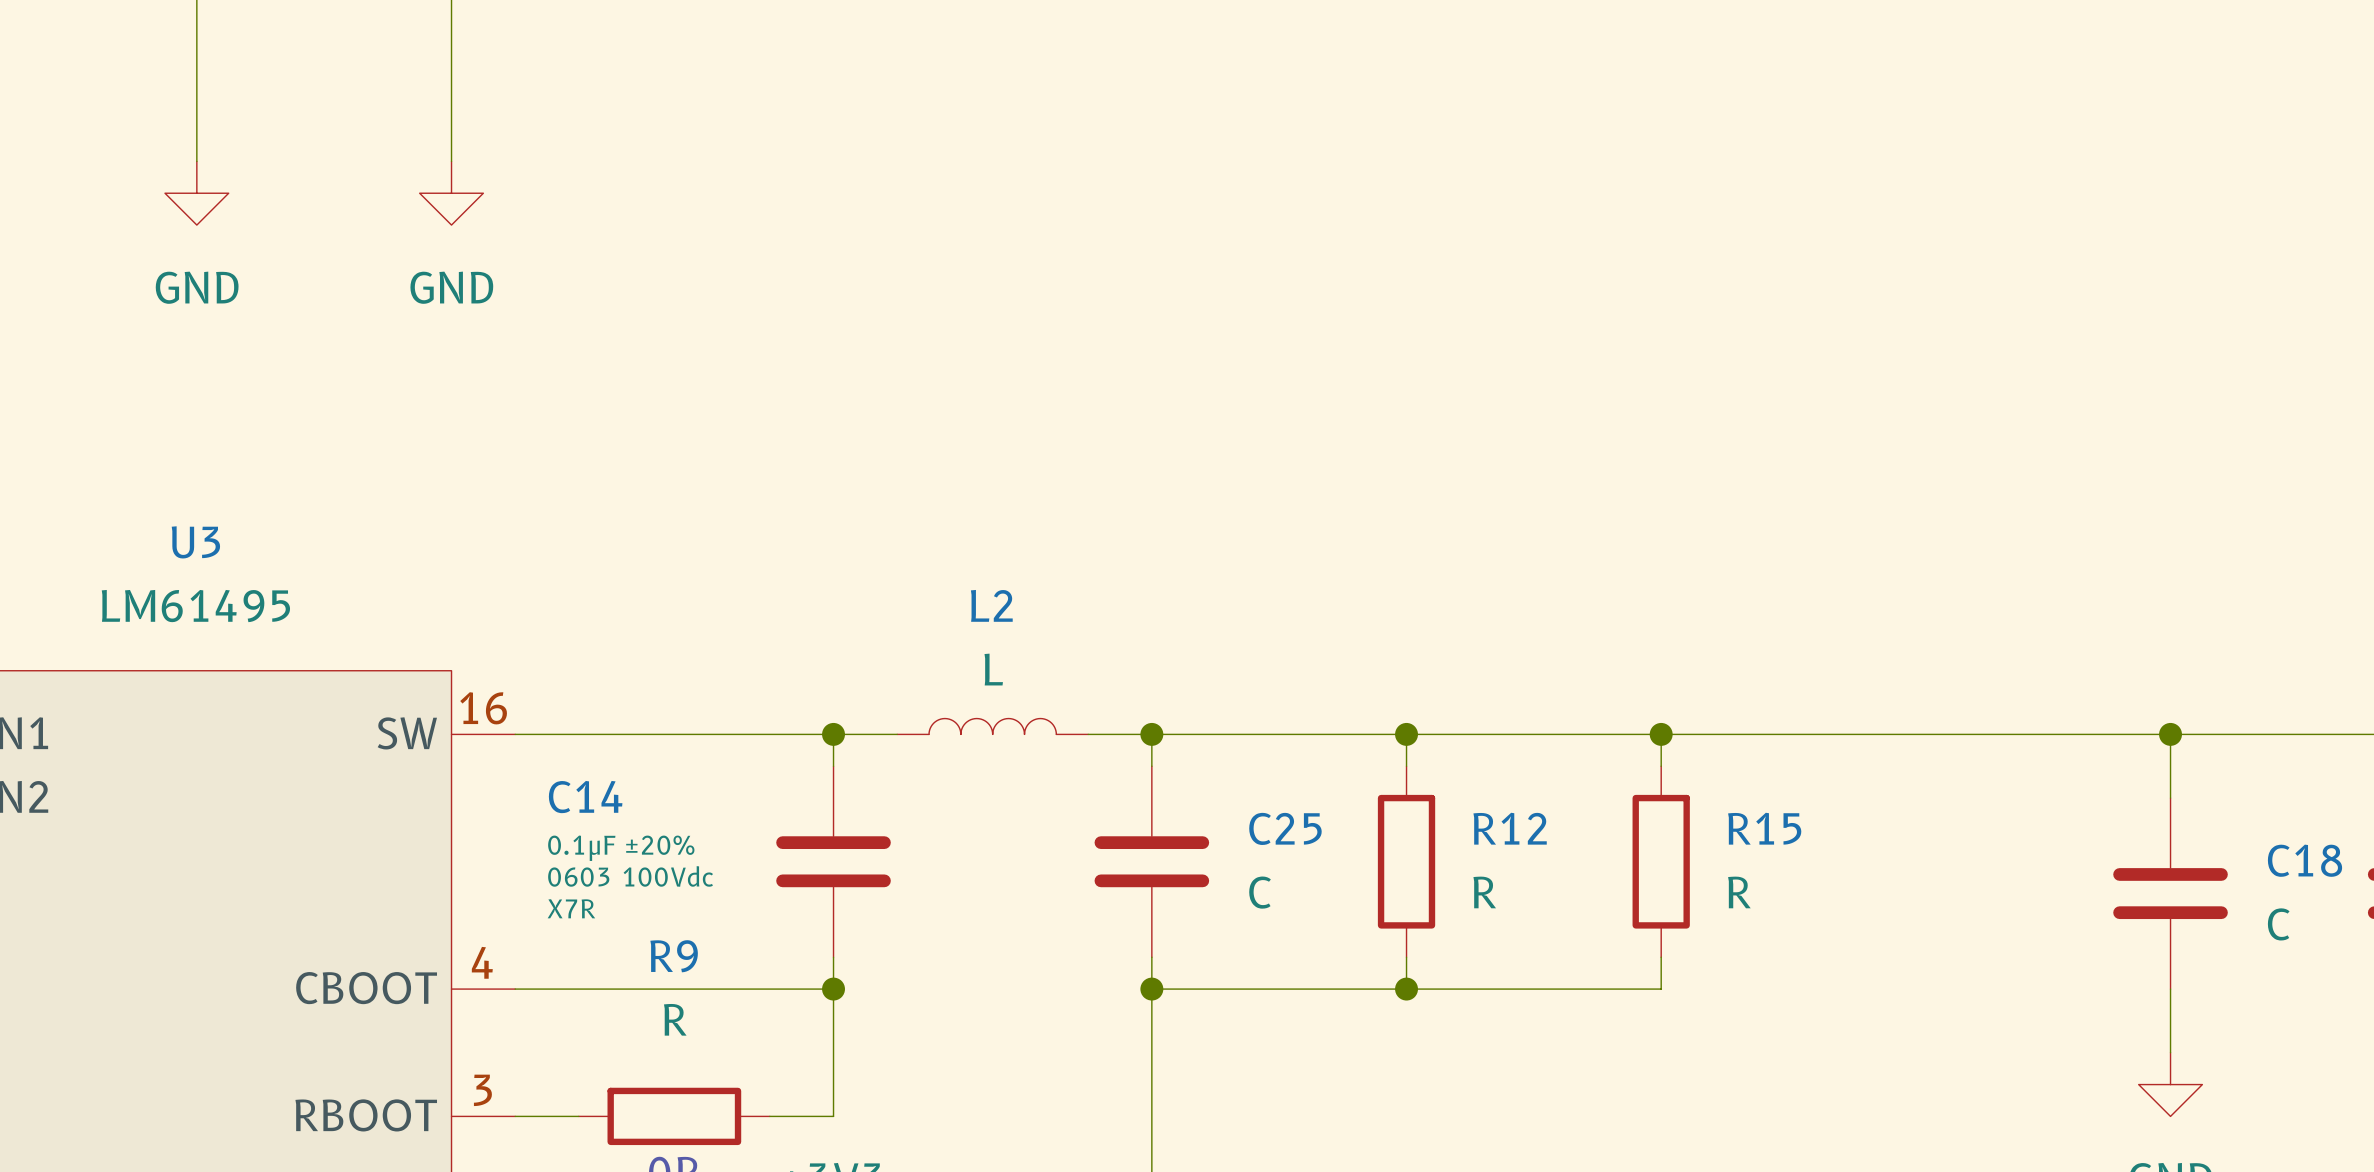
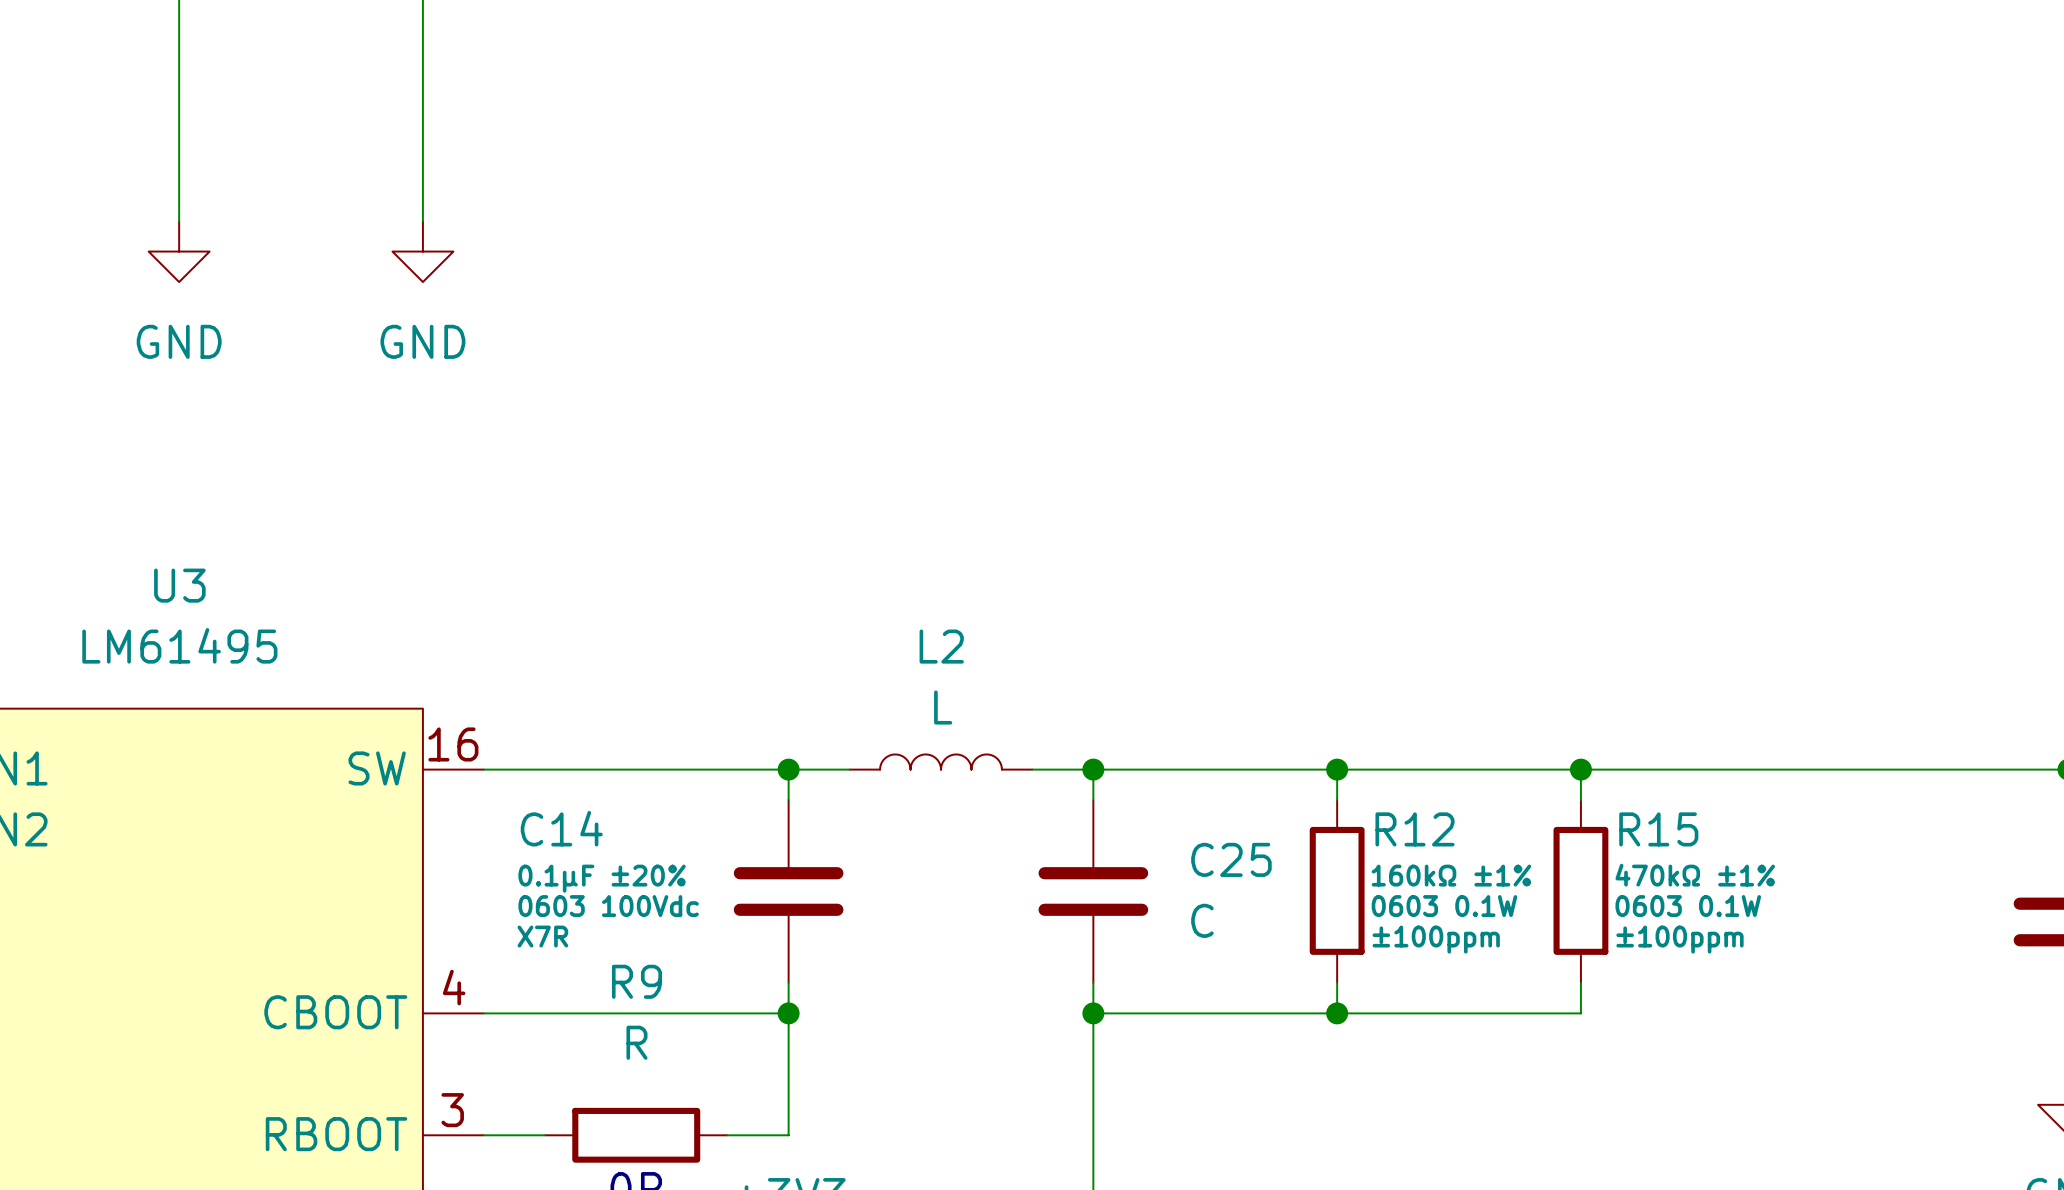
R12 name position: R12 (1510, 828) -> R12 (1415, 829)
R15 name position: R15 (1764, 828) -> R15 (1658, 829)
R12 text: none -> 160kΩ ±1% (1451, 875)
R15 text: none -> 470kΩ ±1% (1695, 875)
R12 text: none -> 0603 0.1W (1444, 906)
R15 text: none -> 0603 0.1W (1688, 906)
R12 value: R (1484, 892) -> none
R15 value: R (1739, 892) -> none
R12 text: none -> ±100ppm (1436, 939)
R15 text: none -> ±100ppm (1679, 939)

